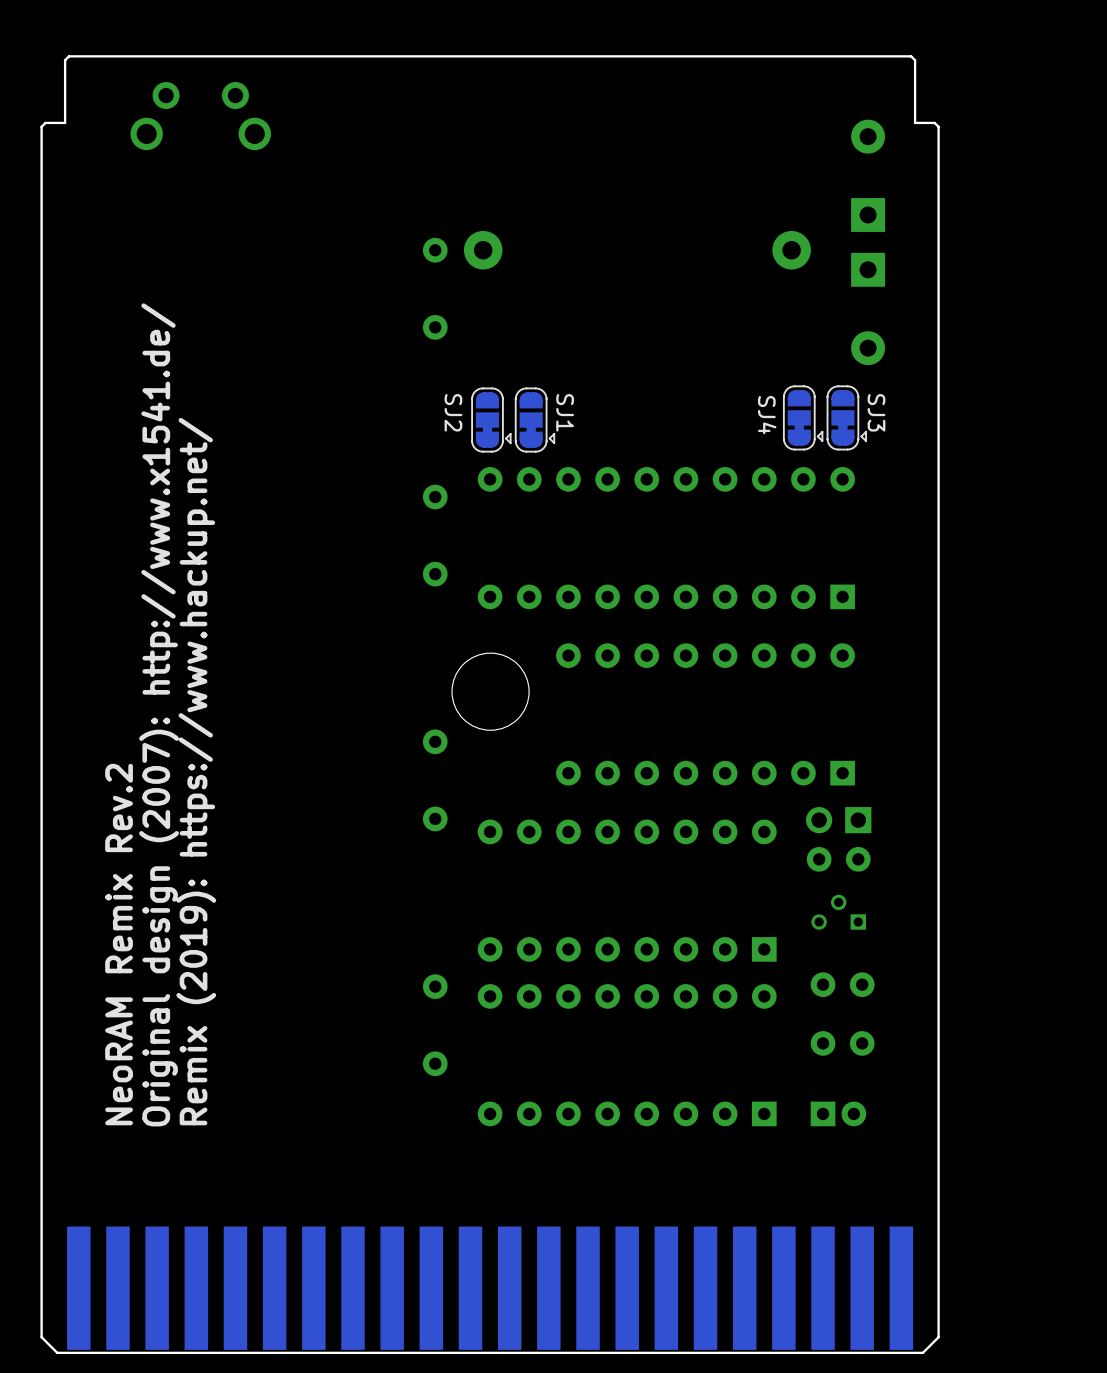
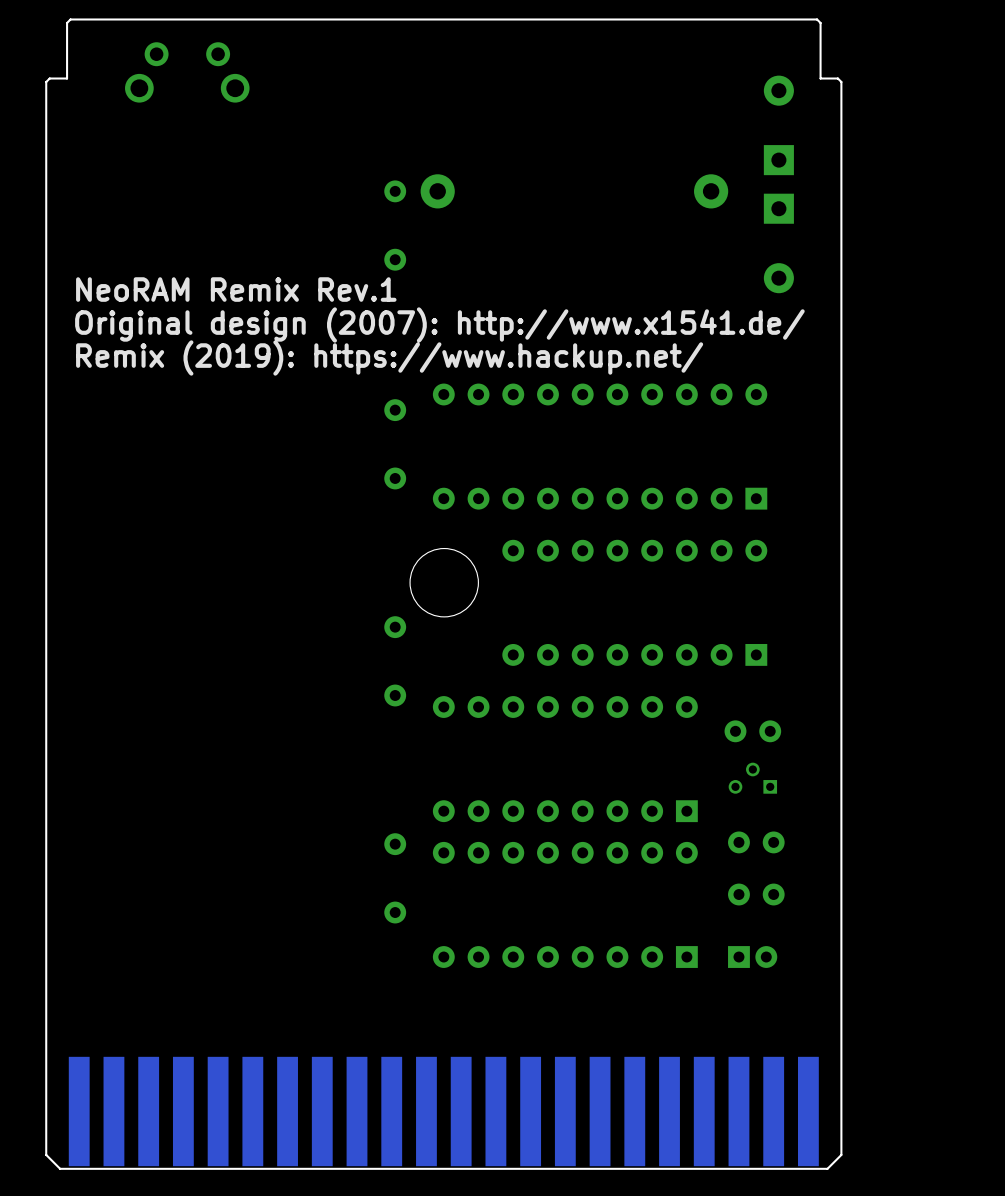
text: none -> NeoRAM Remix Rev.1 (236, 289)
text: none -> Original design (2007): http://www.x1541.de/ (439, 324)
SJ4: (803, 417) -> none
SJ3: (846, 417) -> none
SJ2: (491, 420) -> none
SJ1: (535, 420) -> none
text: none -> Remix (2019): https://www.hackup.net/ (389, 358)
text: Original design (2007): http://www.x1541.de/ (159, 714) -> none
text: Remix (2019): https://www.hackup.net/ (196, 771) -> none
part: (838, 820) -> none
text: NeoRAM Remix Rev.2 (119, 944) -> none

